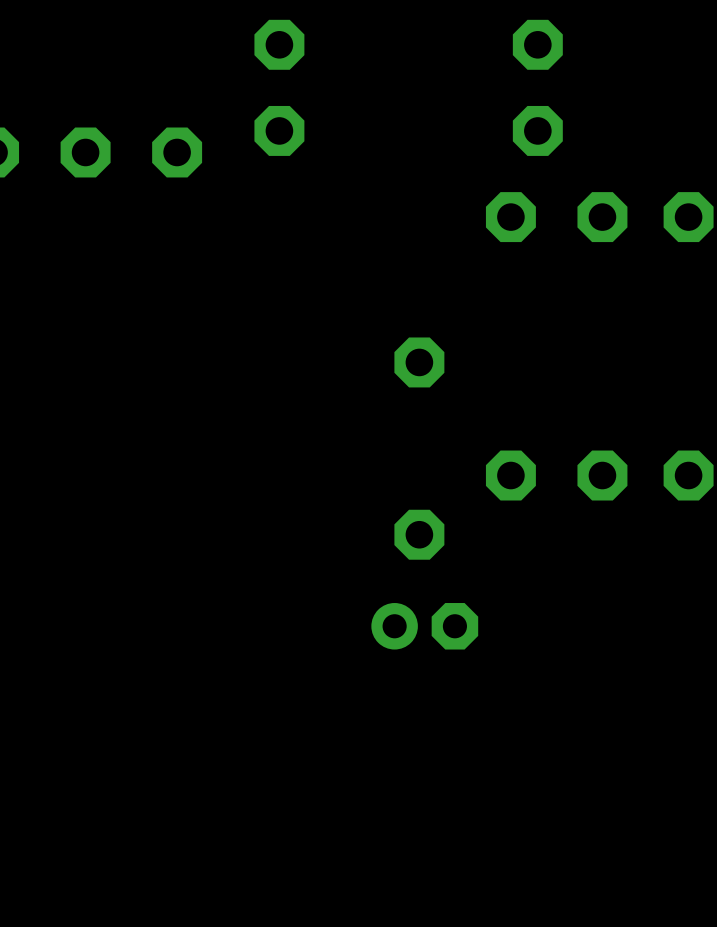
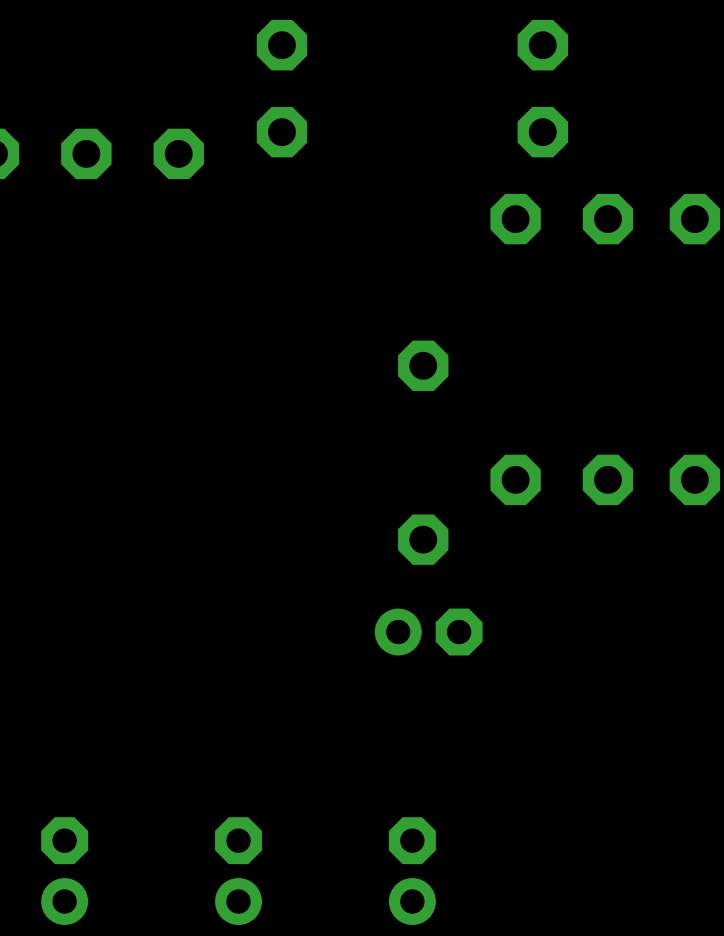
part: none -> (64, 871)
part: none -> (238, 871)
part: none -> (412, 871)

